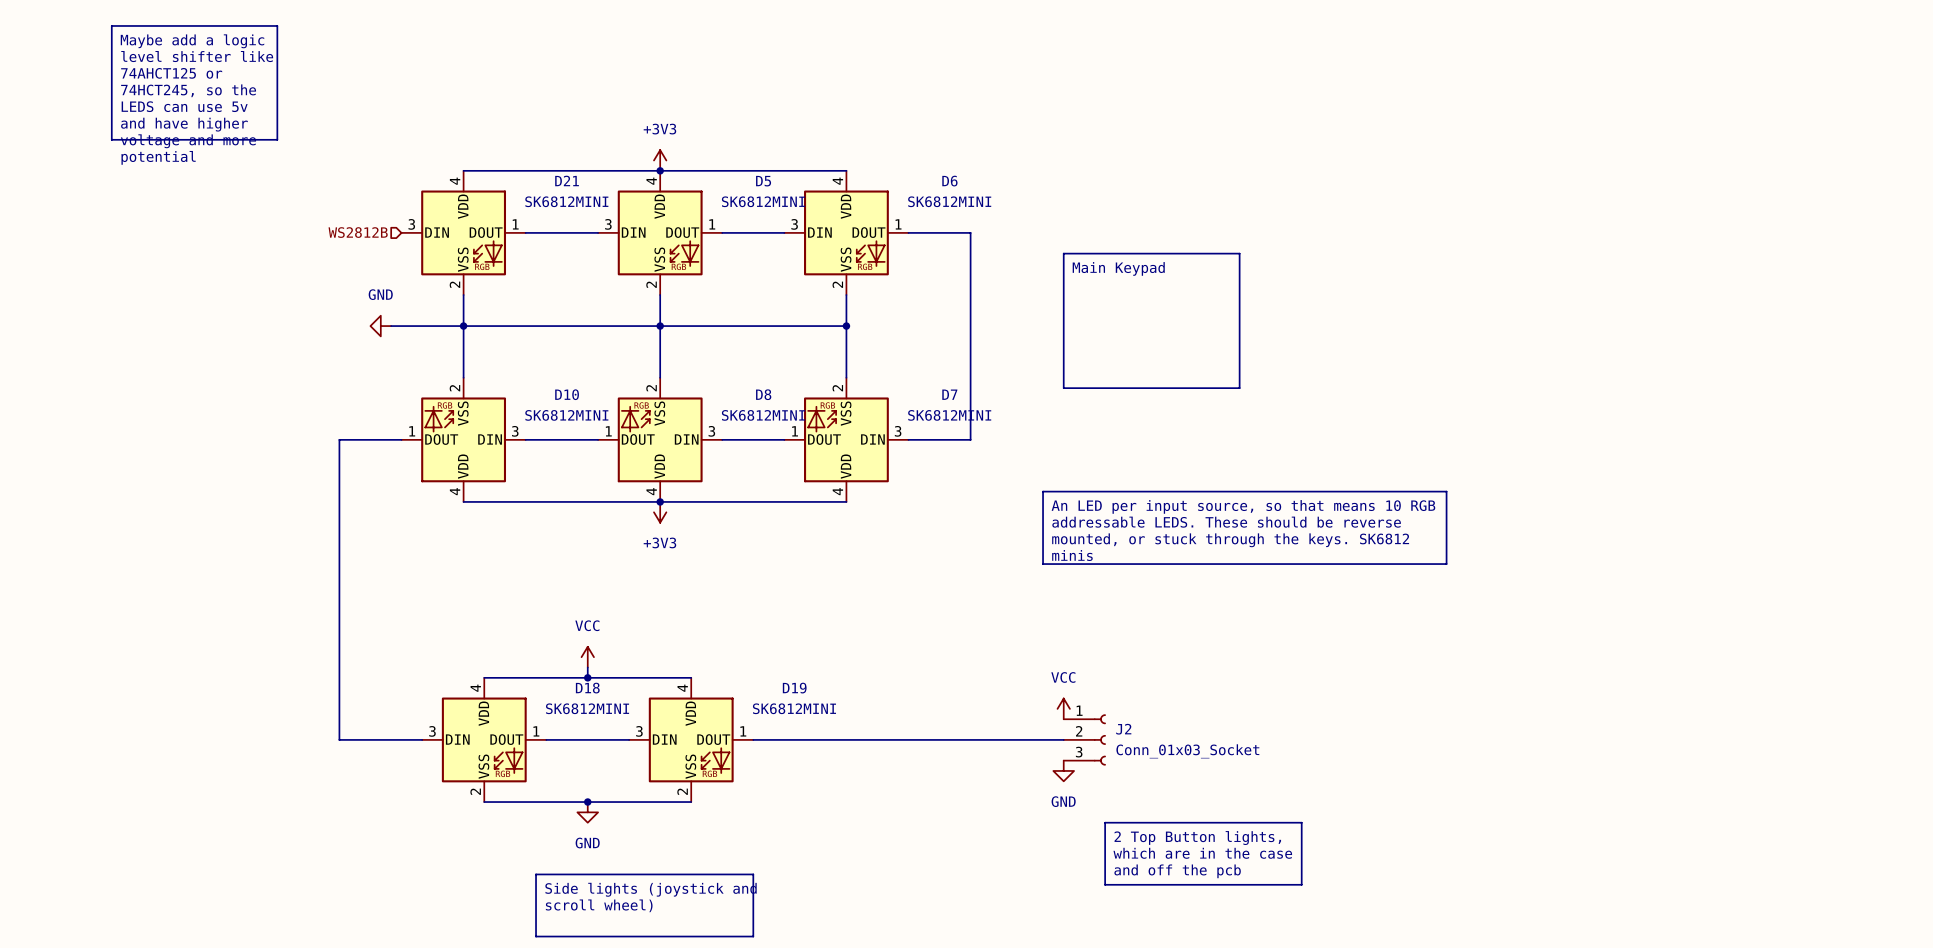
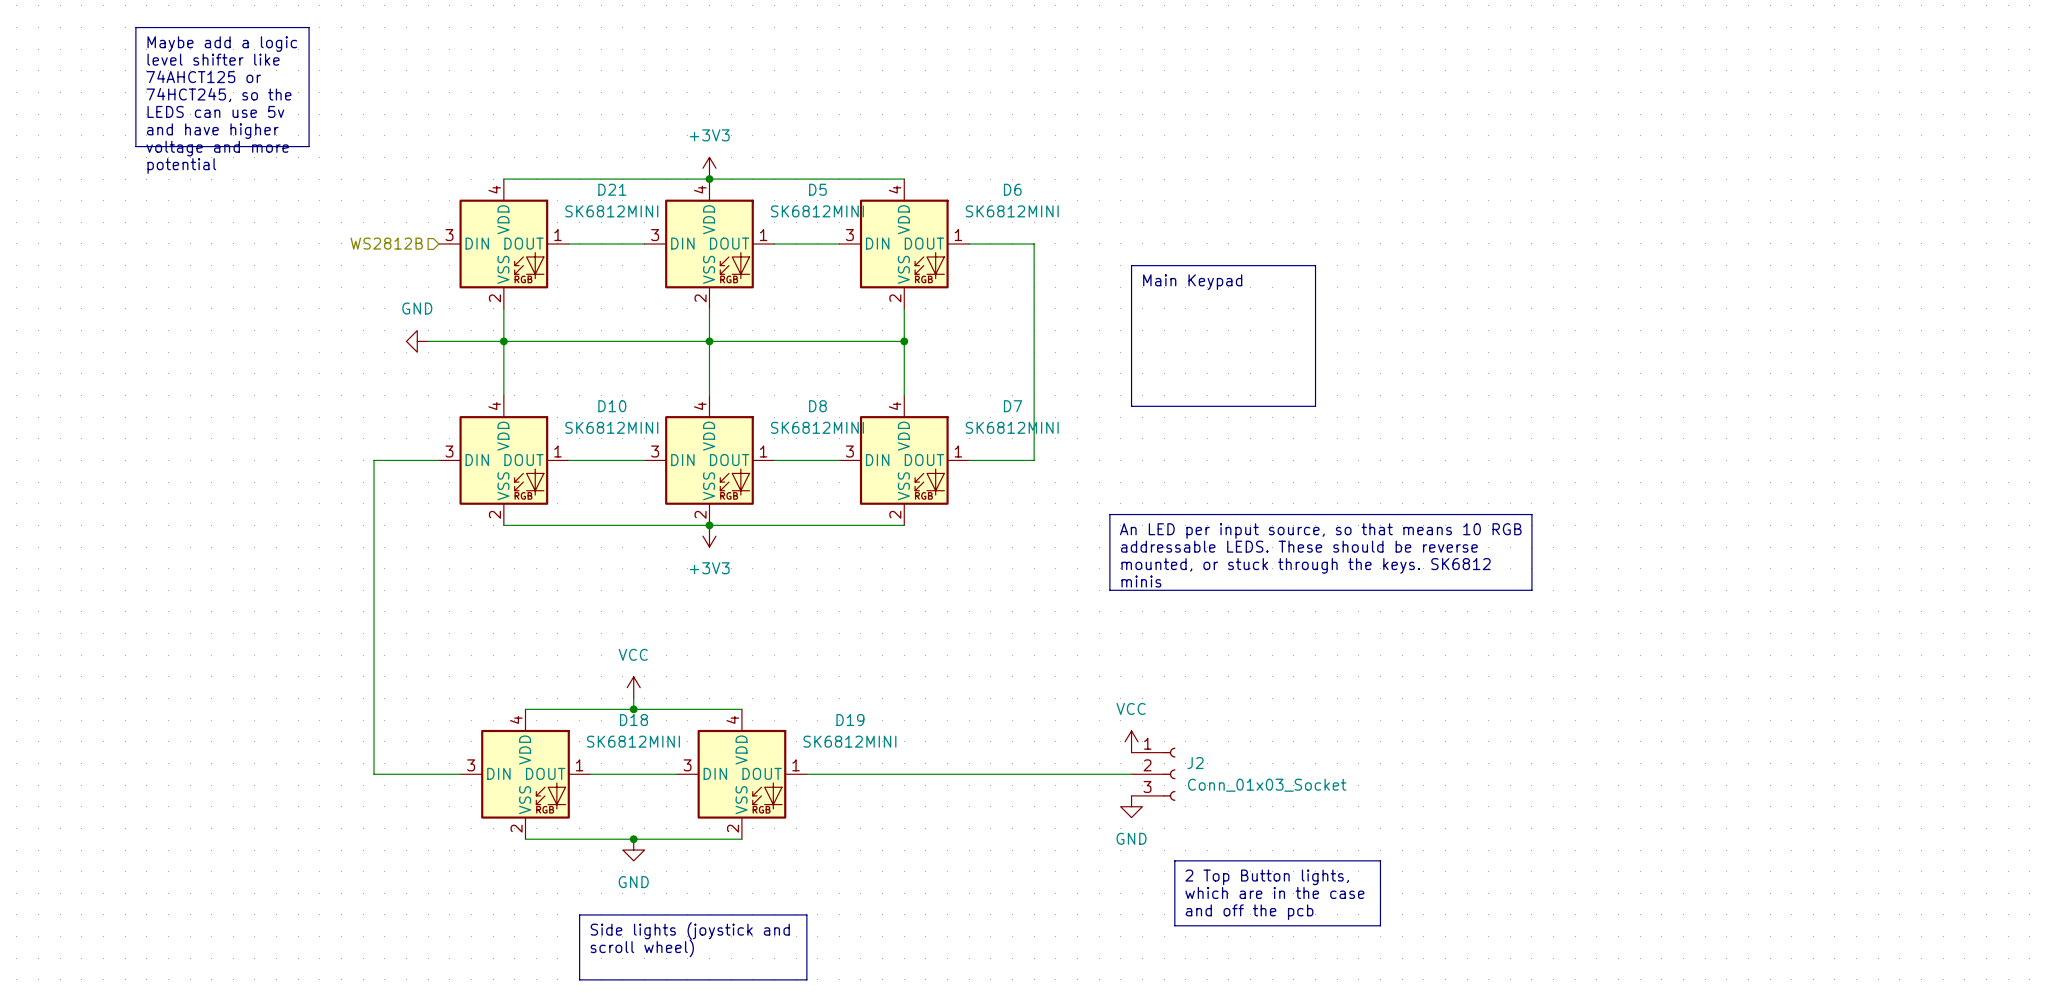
D10 rotation: 0° (463, 439) -> 180° (503, 460)
D8 rotation: 0° (660, 439) -> 180° (709, 460)
D7 rotation: 0° (846, 439) -> 180° (904, 460)

